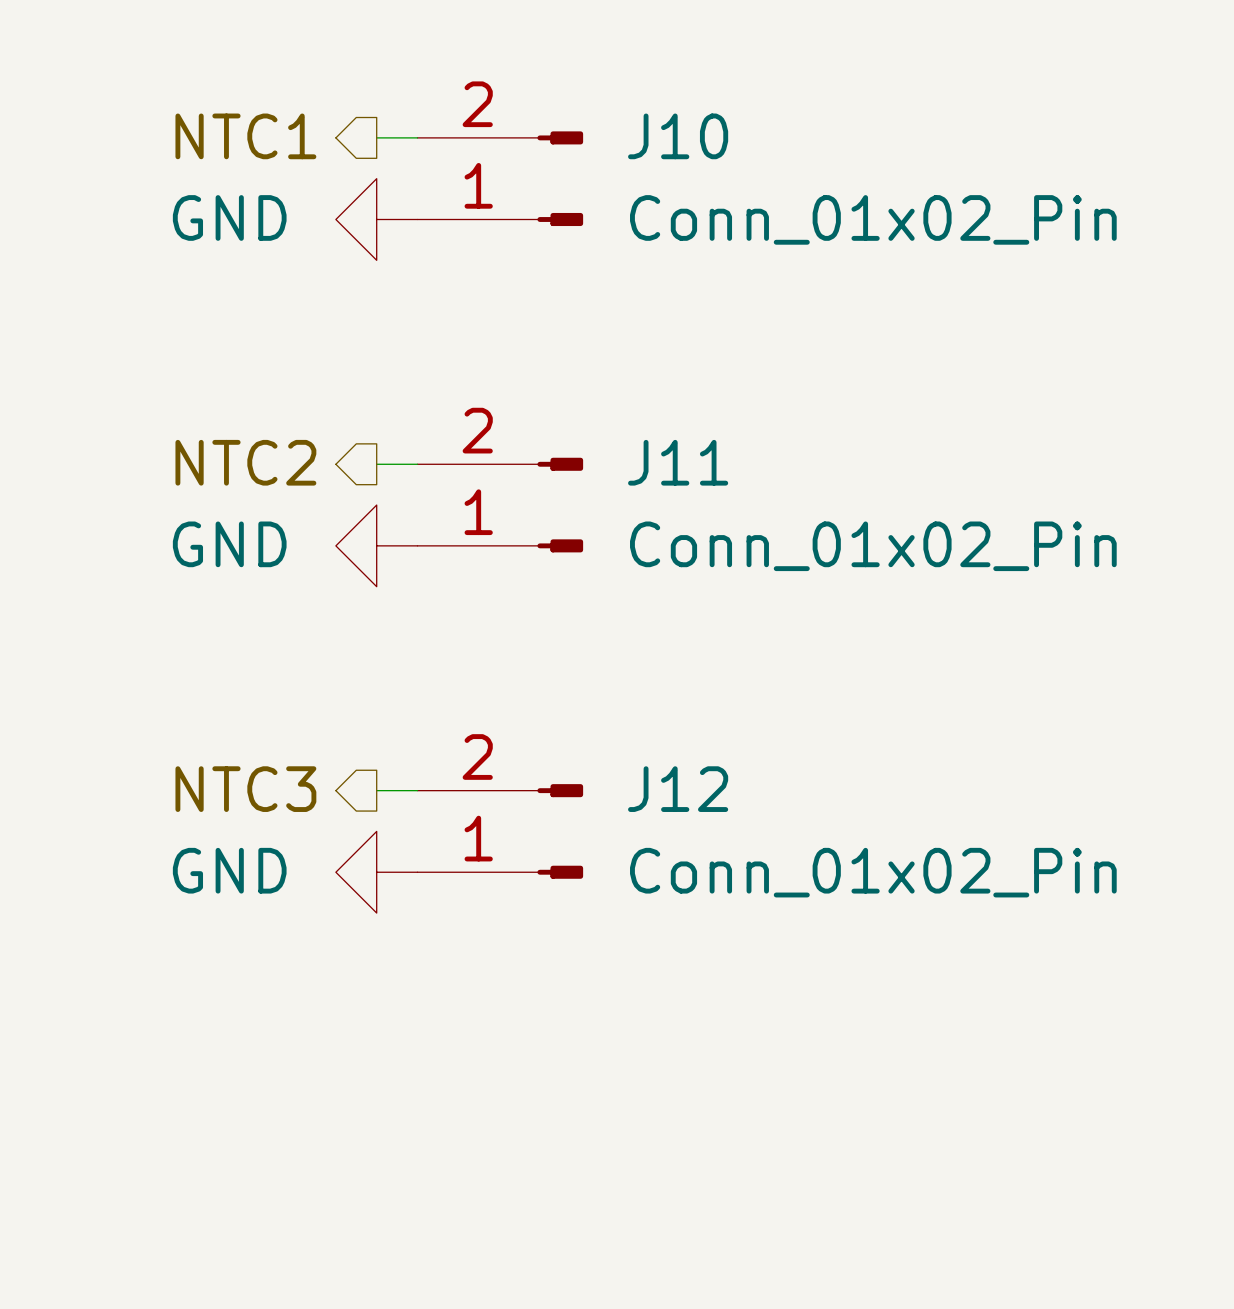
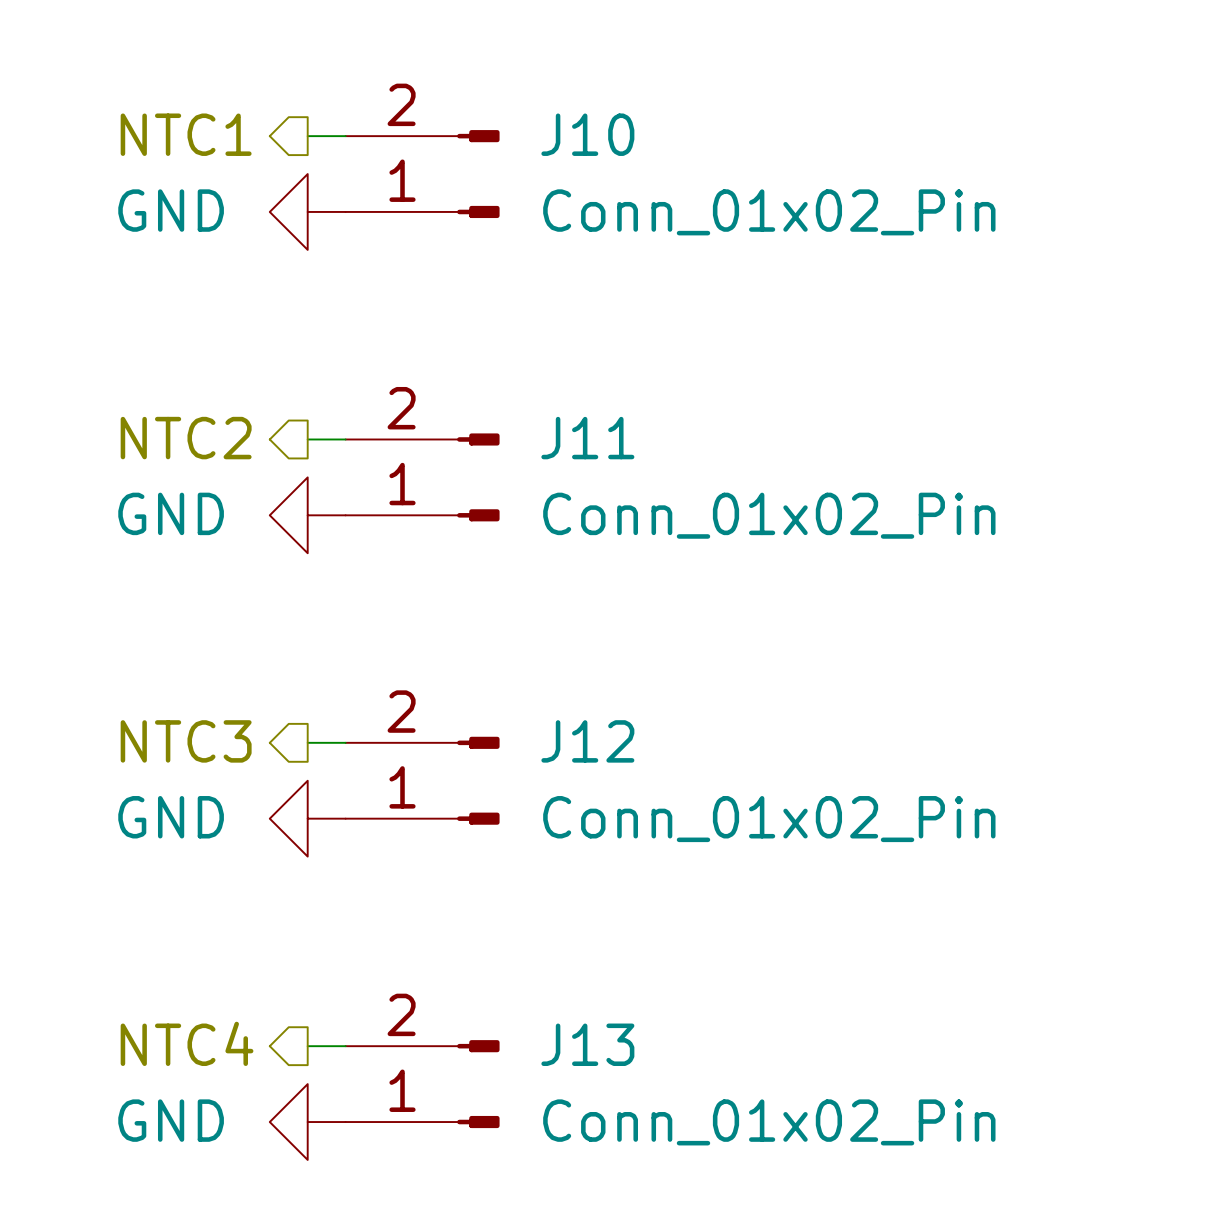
hierarchical label: none -> NTC4 (187, 1043)
wire: none -> (307, 1046) (345, 1046)
J13: none -> Conn_01x02_Pin (422, 1084)
power symbol: none -> GND (307, 1122)

